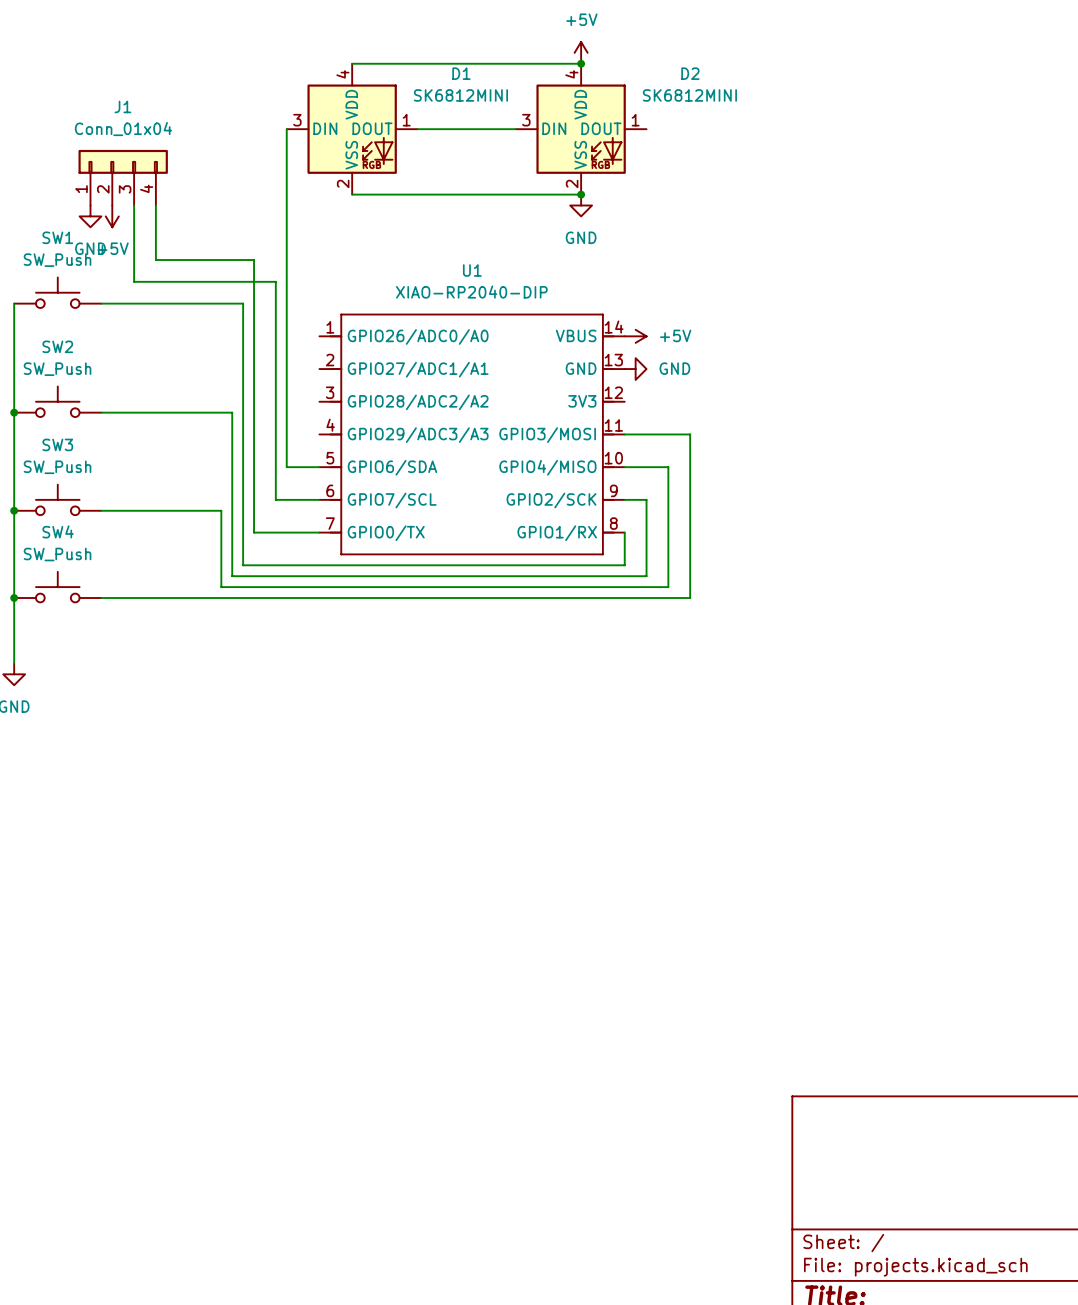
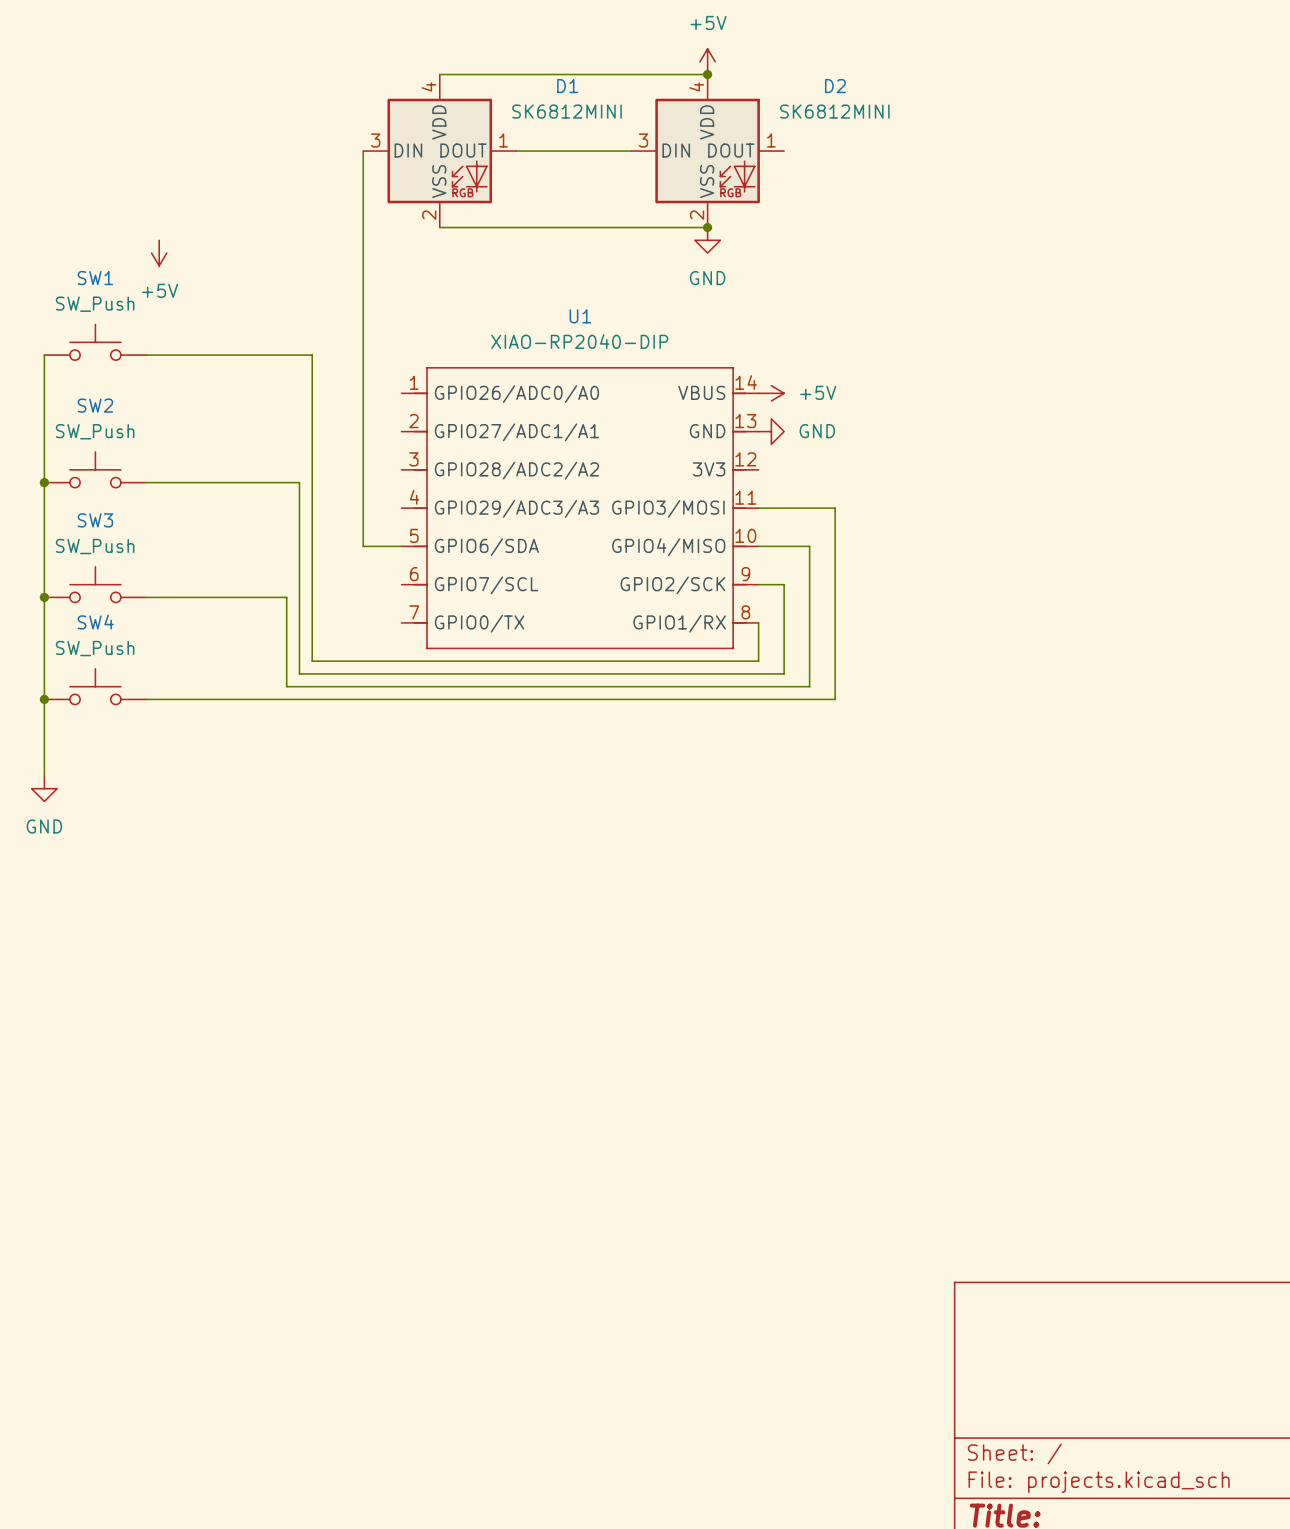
J1: Conn_01x04 (123, 177) -> none
wire: (134, 205) (134, 281) (275, 281) (275, 499) (319, 499) -> none
wire: (155, 205) (155, 260) (254, 260) (254, 532) (319, 532) -> none
power symbol: GND (90, 216) -> none

